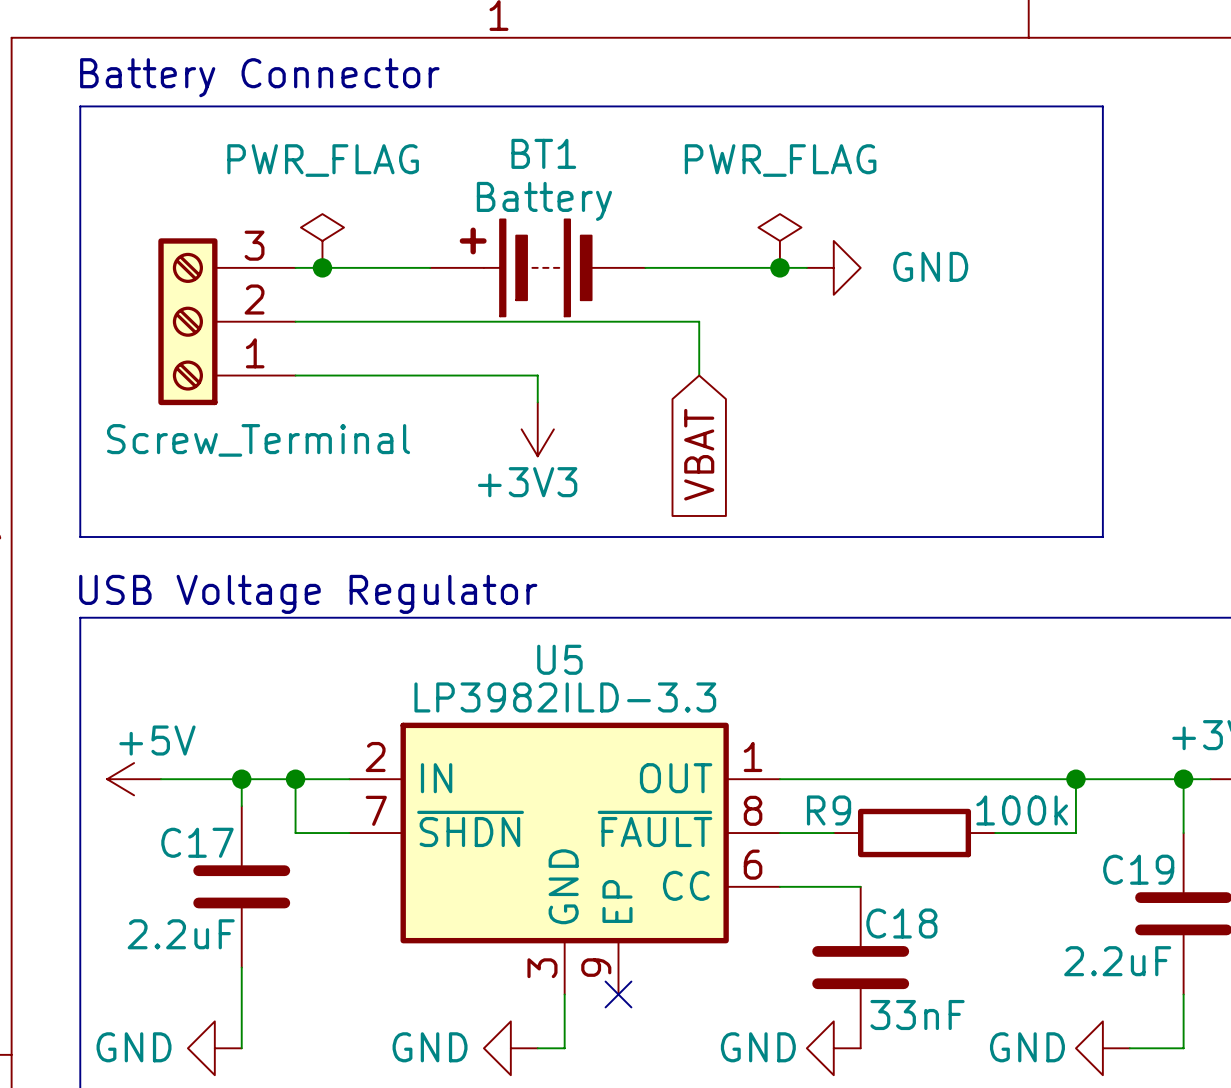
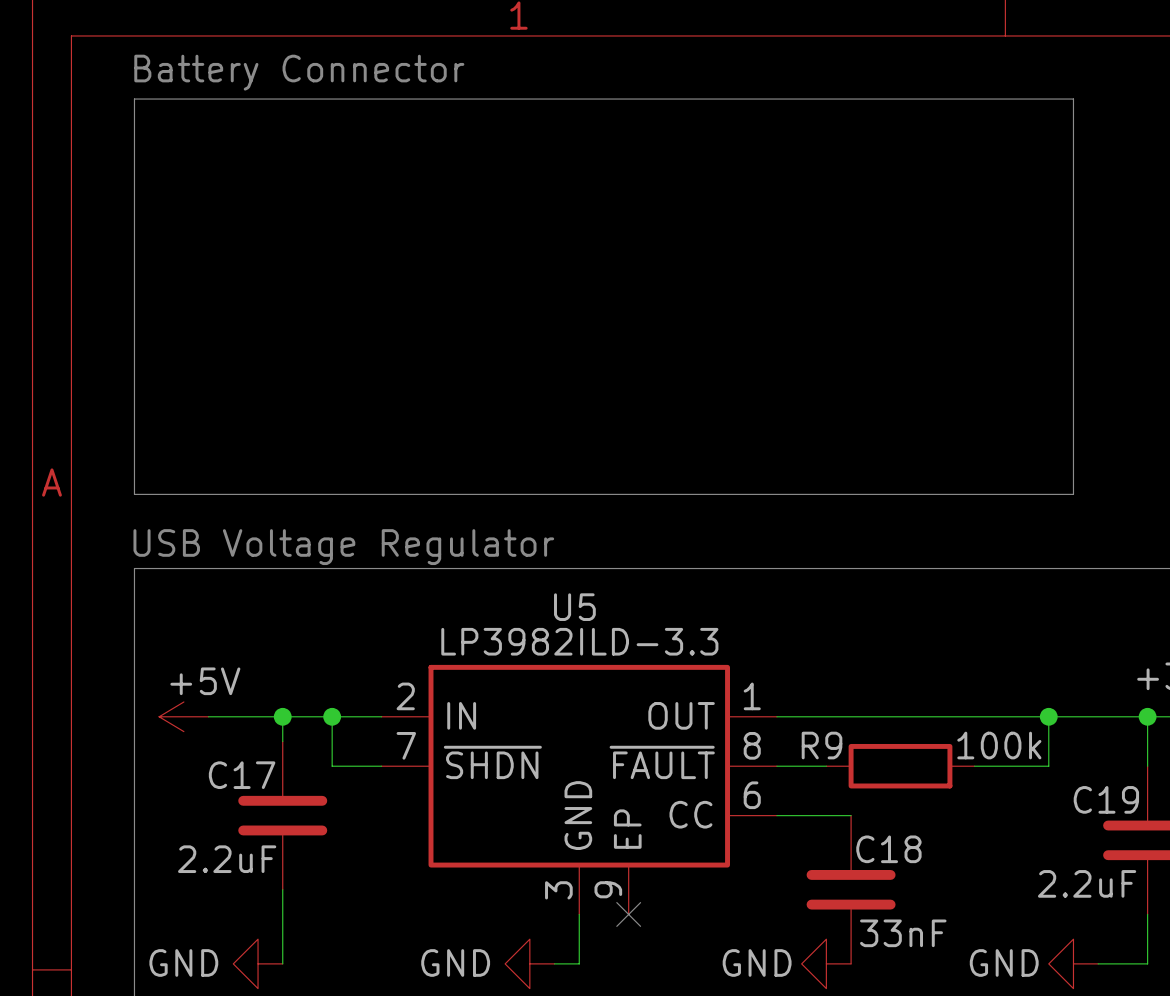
power symbol: PWR_FLAG (322, 240) -> none
power symbol: PWR_FLAG (779, 240) -> none
wire: (295, 267) (430, 267) -> none
junction: (322, 267) -> none
BT1: Battery (537, 267) -> none
wire: (645, 267) (806, 267) -> none
junction: (779, 267) -> none
power symbol: GND (833, 267) -> none
part: Screw_Terminal (226, 321) -> none
wire: (295, 321) (699, 321) (699, 375) -> none
wire: (295, 375) (537, 375) (537, 402) -> none
power symbol: +3V3 (537, 429) -> none
global label: VBAT (699, 454) -> none

